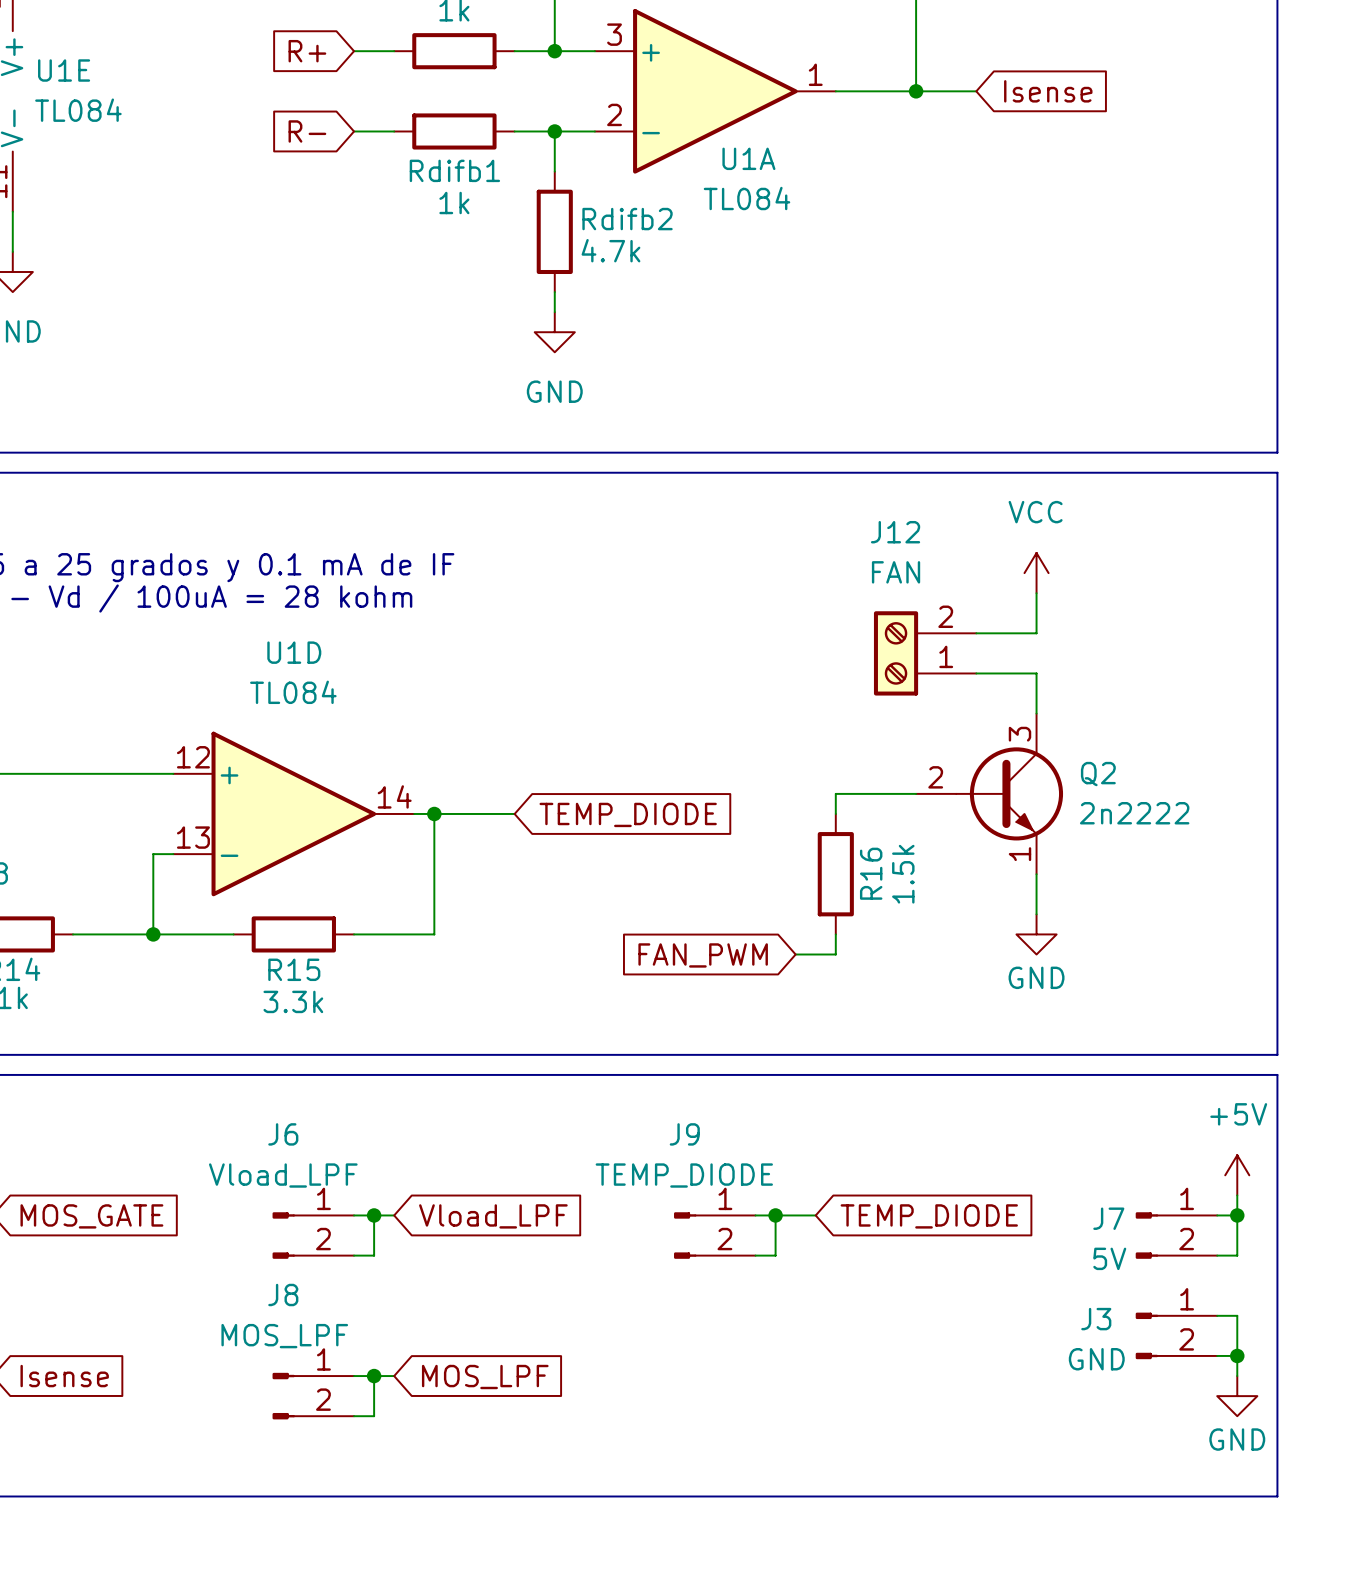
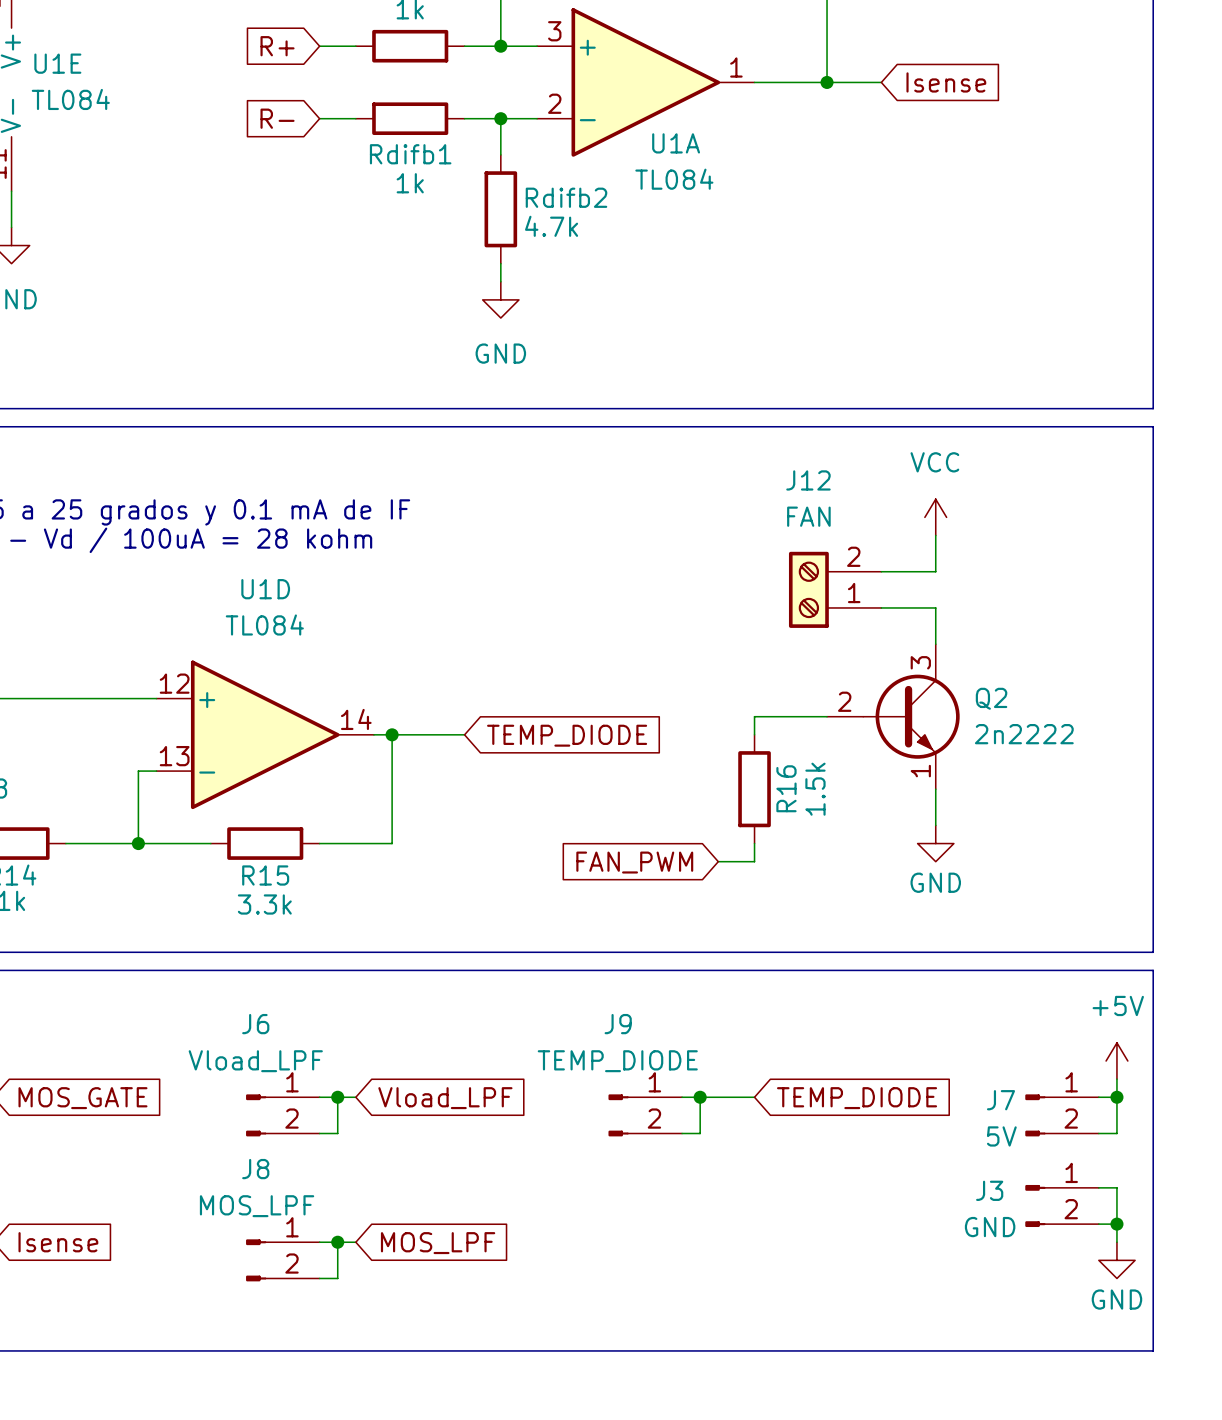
wire: none -> (736, 1097) (754, 1097)
global label position: TEMP_DIODE (929, 1216) -> TEMP_DIODE (857, 1098)

